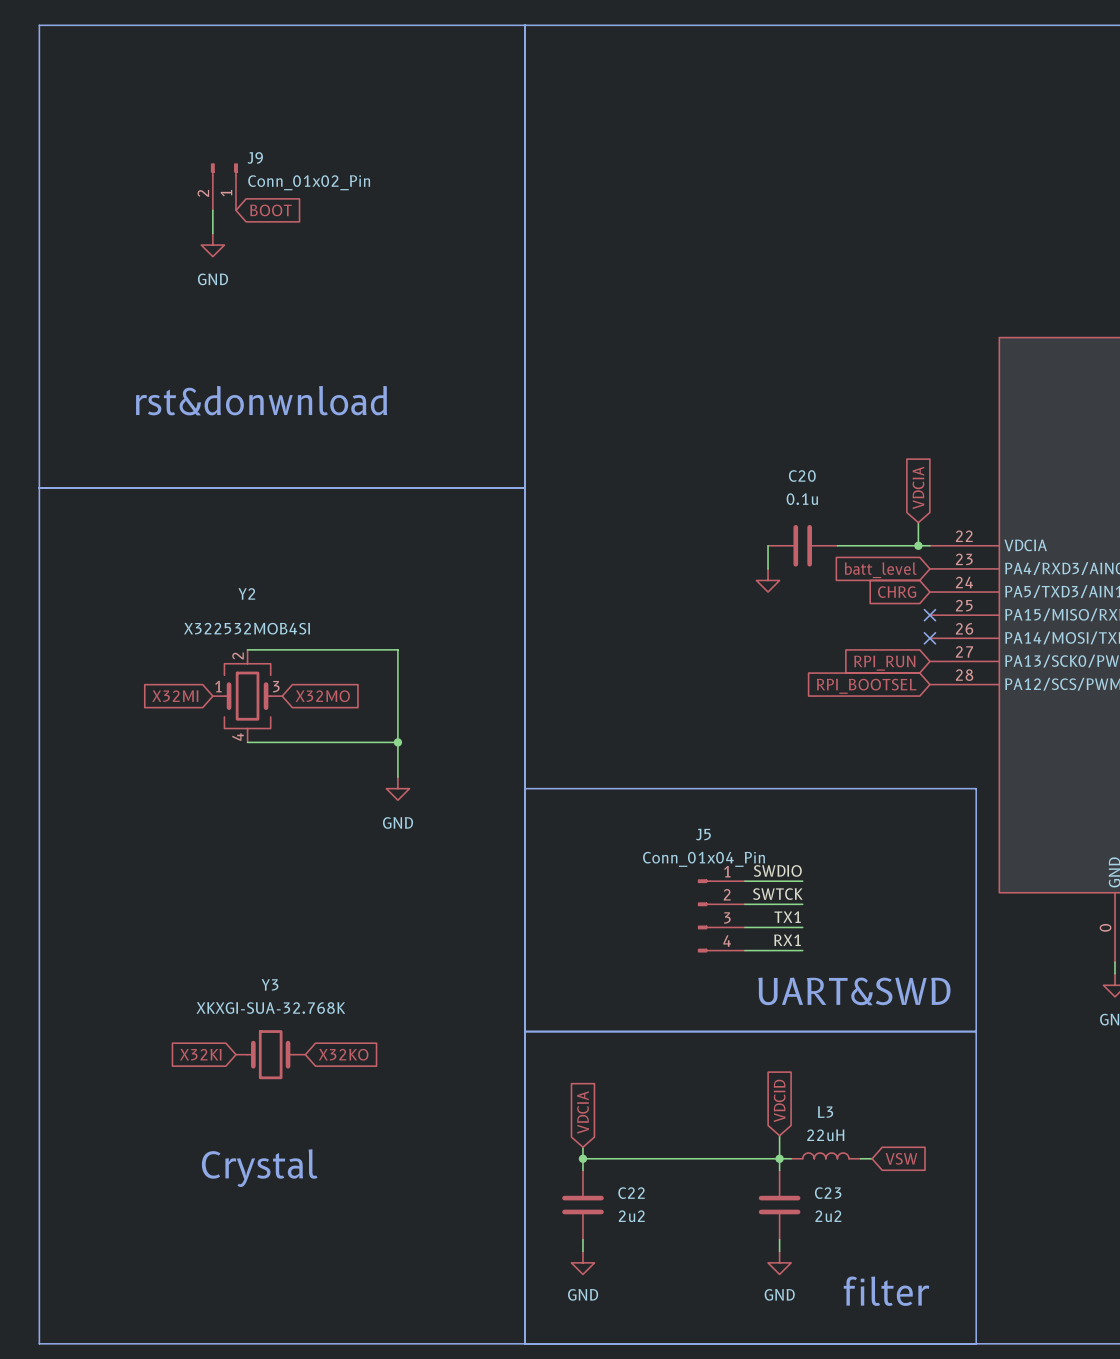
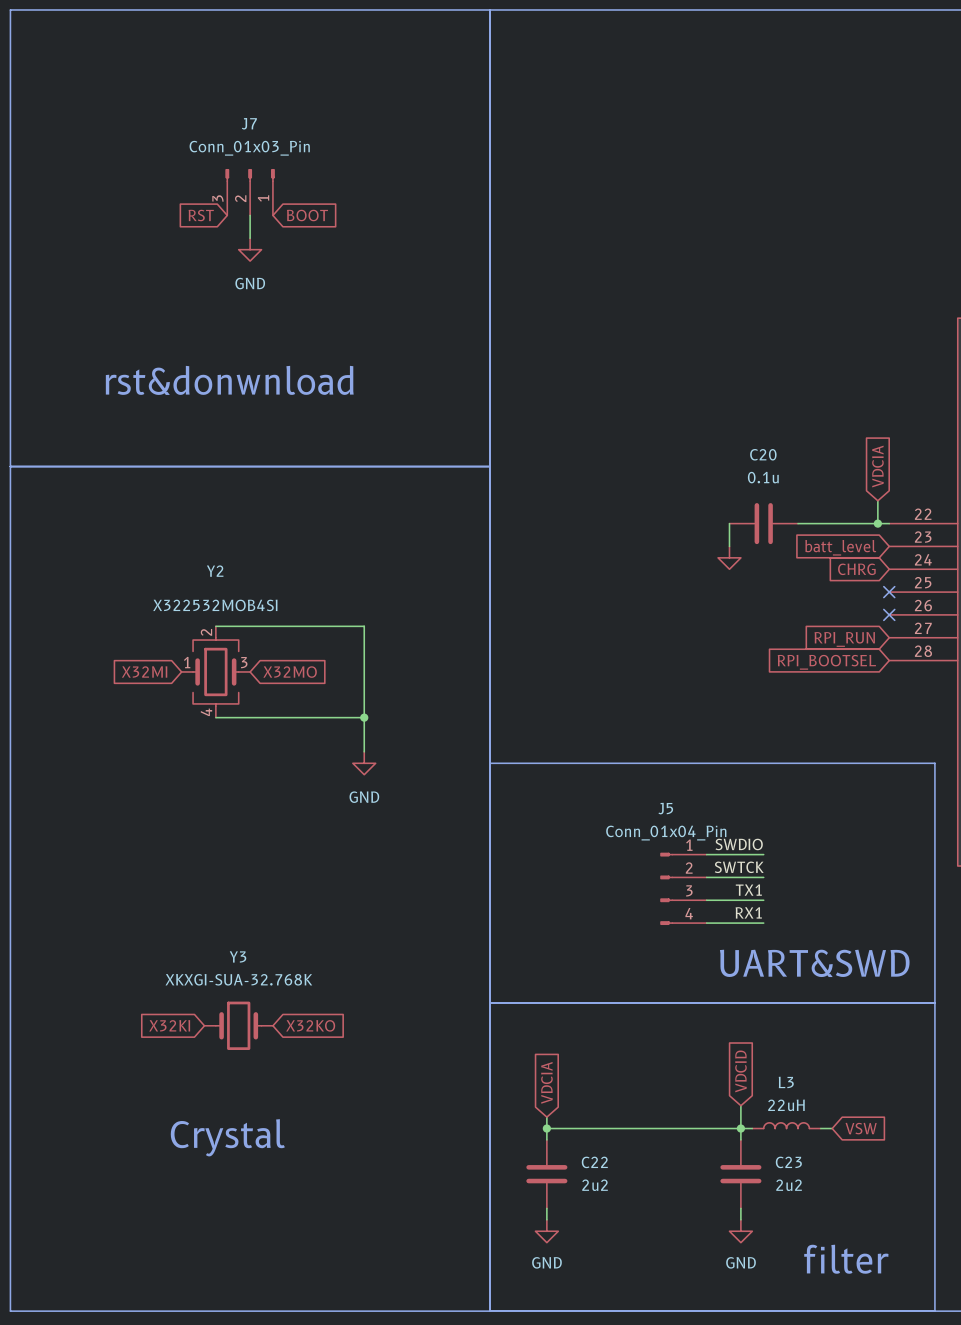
J9: Conn_01x02_Pin (224, 186) -> none
wire: (212, 210) (212, 233) -> (250, 215) (250, 238)
global label position: BOOT (270, 210) -> BOOT (307, 215)
J7: none -> Conn_01x03_Pin (250, 192)
global label: none -> RST (201, 215)
power symbol position: GND (212, 245) -> GND (250, 249)

